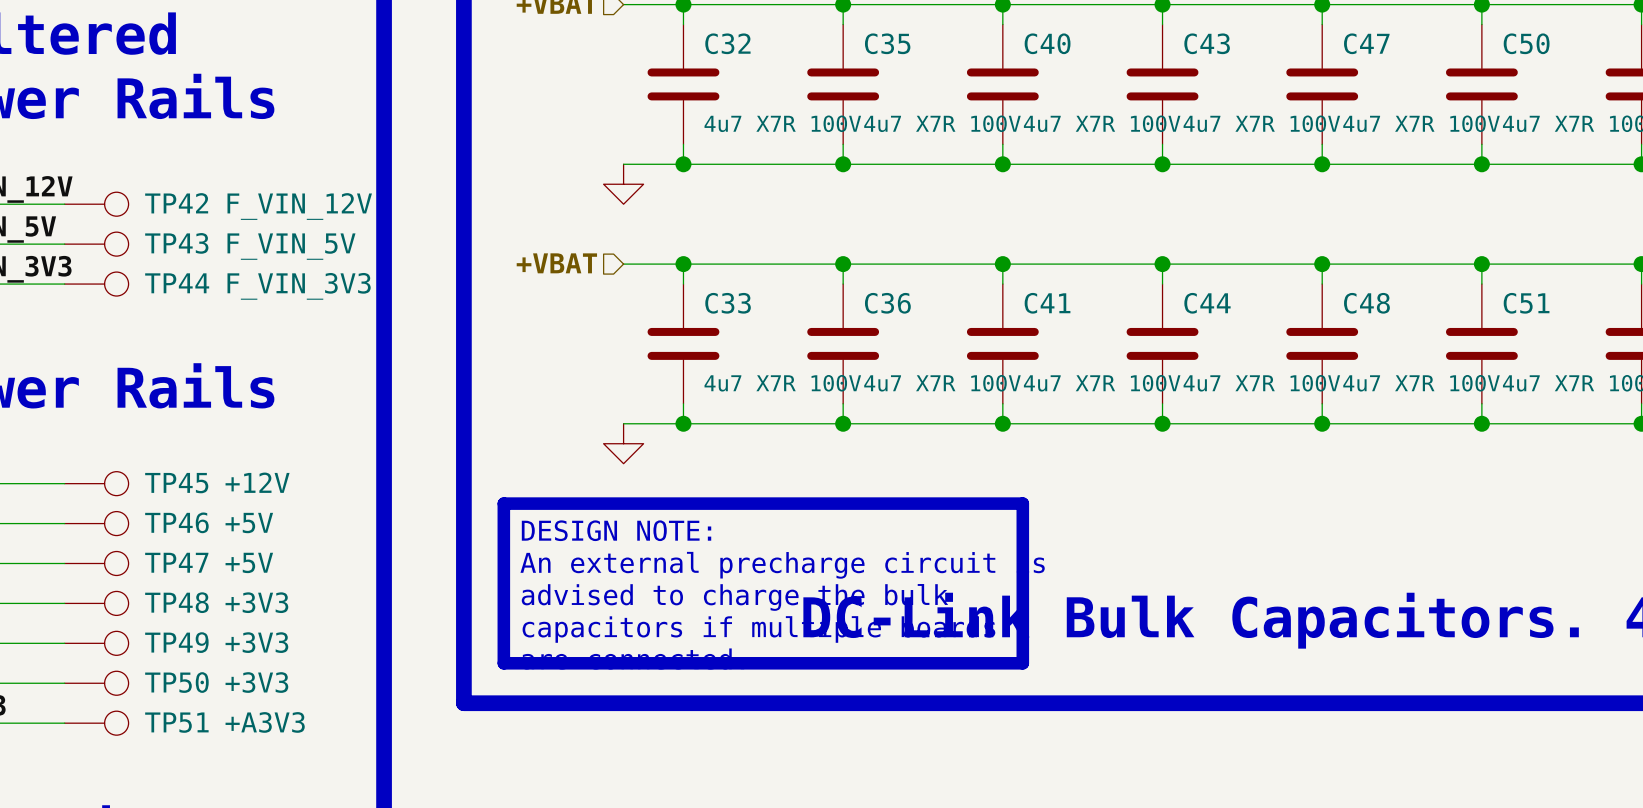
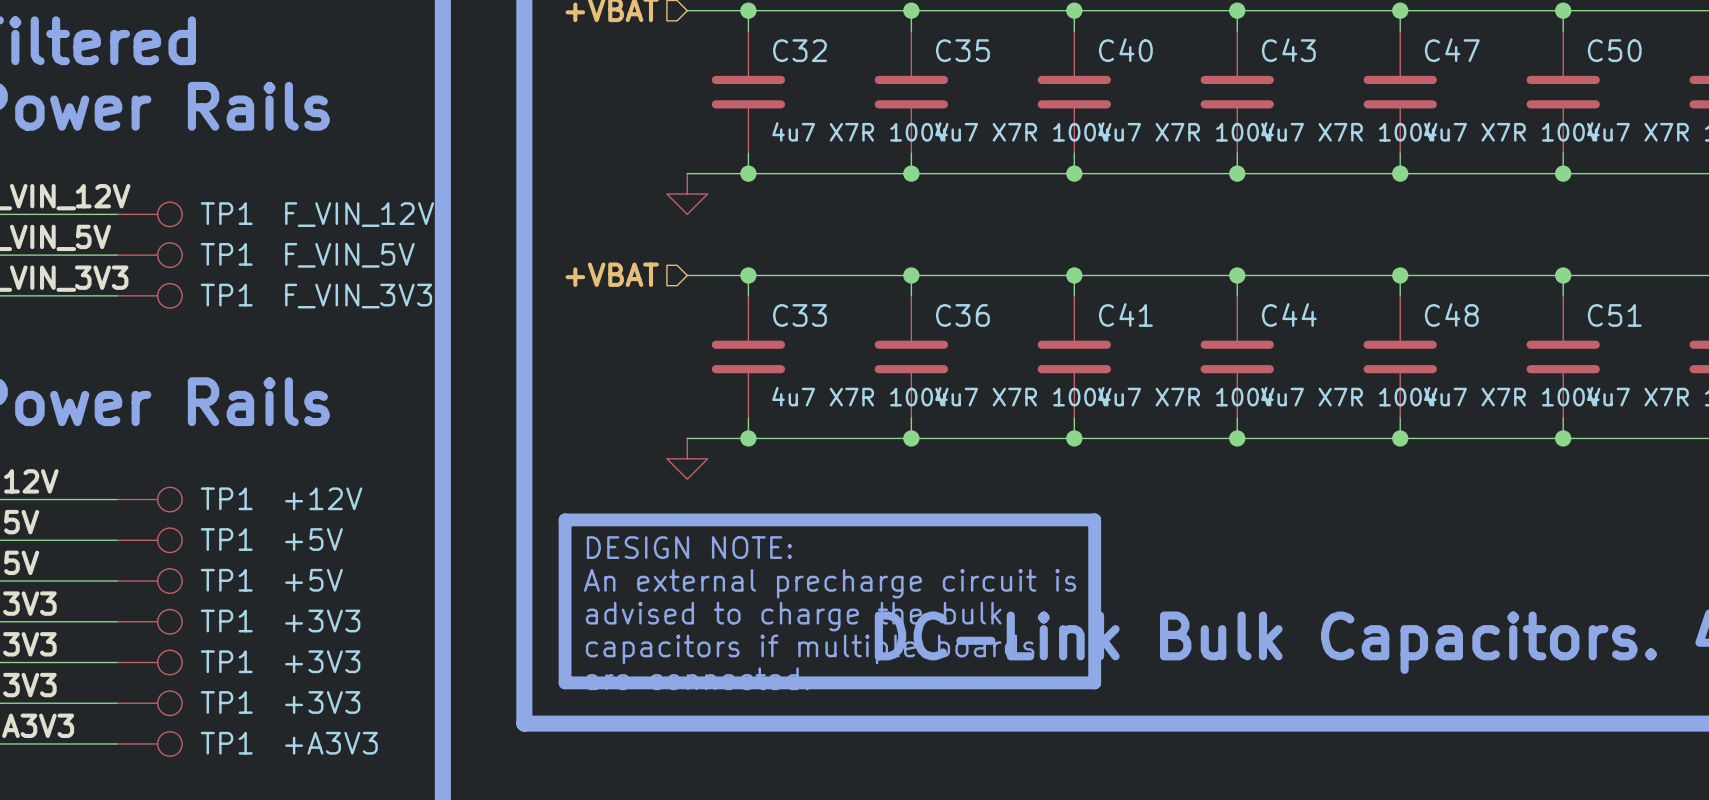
TP42 name: TP42 (176, 203) -> TP1 (226, 213)
TP43 name: TP43 (176, 243) -> TP1 (226, 254)
TP44 name: TP44 (177, 283) -> TP1 (226, 295)
TP45 name: TP45 (176, 483) -> TP1 (226, 498)
TP46 name: TP46 (176, 522) -> TP1 (226, 539)
TP47 name: TP47 (176, 562) -> TP1 (226, 580)
TP48 name: TP48 (176, 602) -> TP1 (226, 621)
TP49 name: TP49 (176, 642) -> TP1 (226, 661)
TP50 name: TP50 (176, 682) -> TP1 (226, 702)
TP51 name: TP51 (176, 722) -> TP1 (226, 743)

